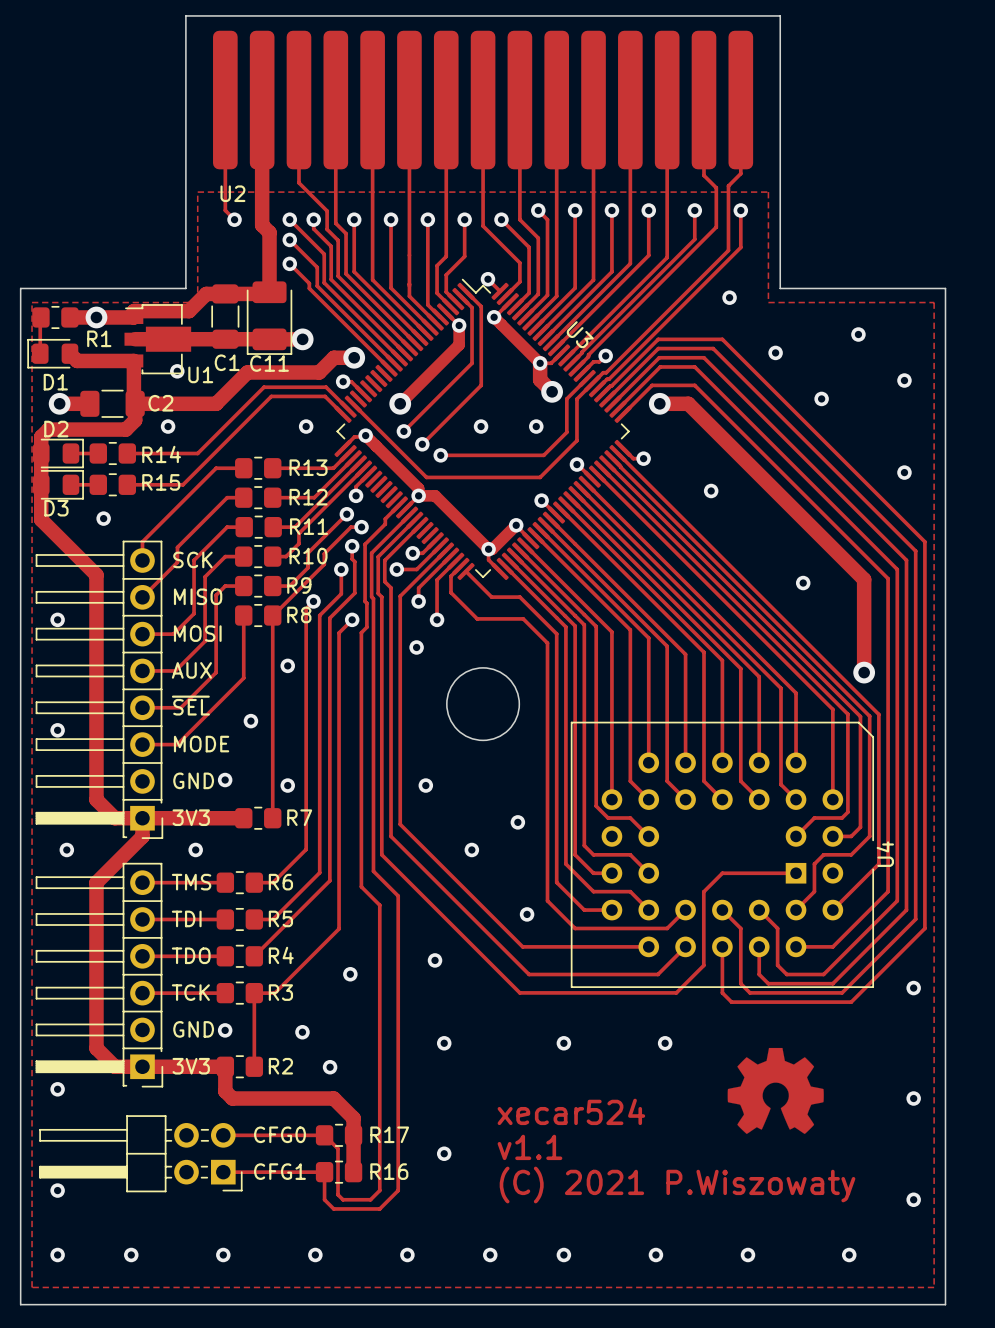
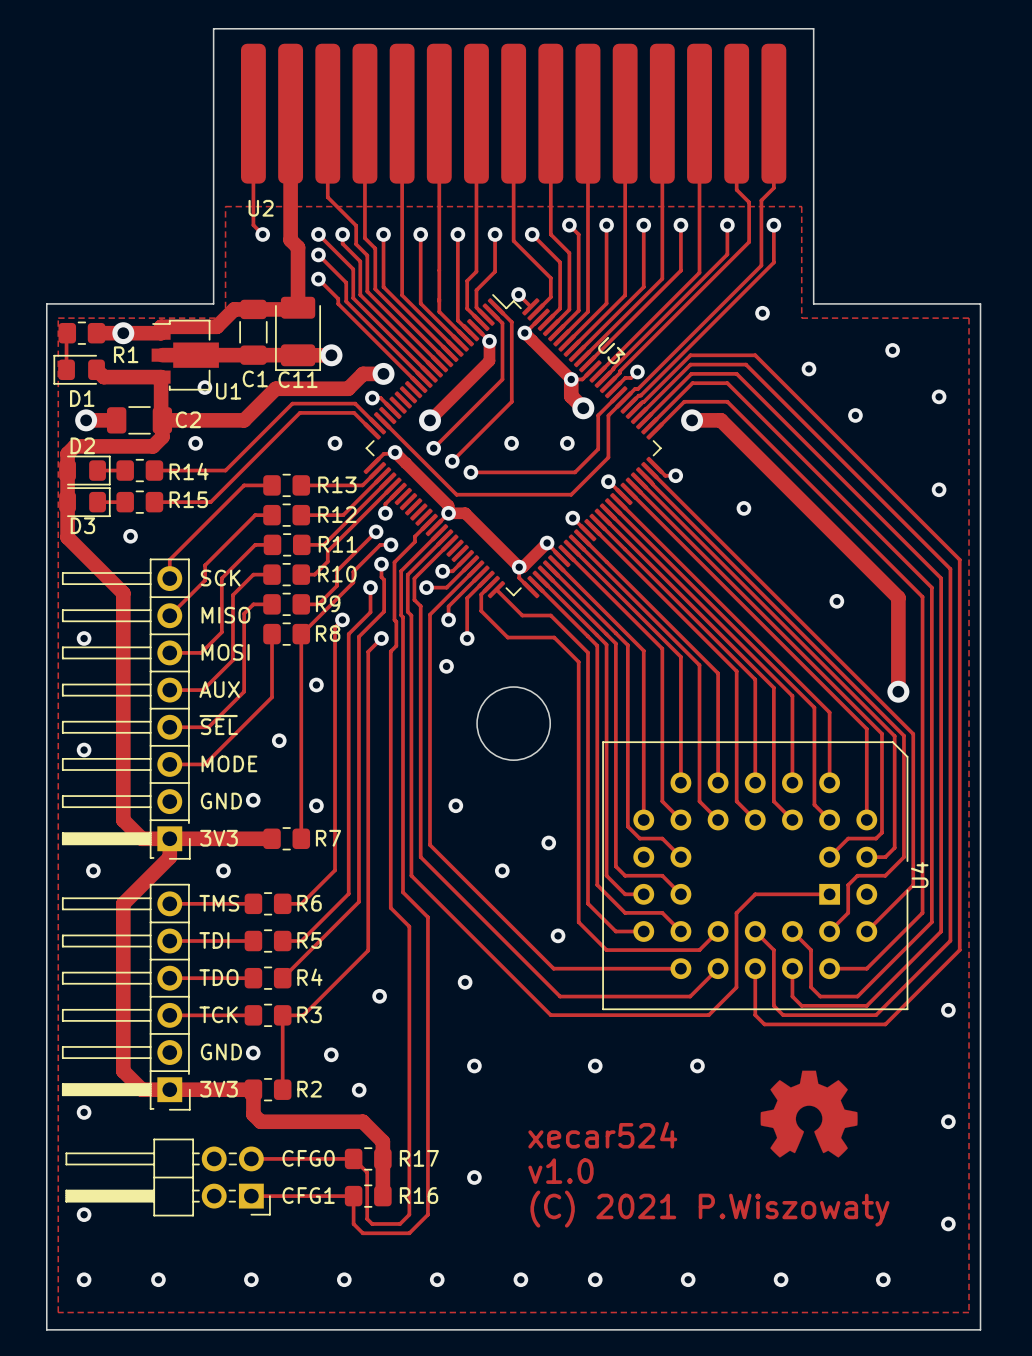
text: v1.1 (529, 1147) -> v1.0 (560, 1171)

